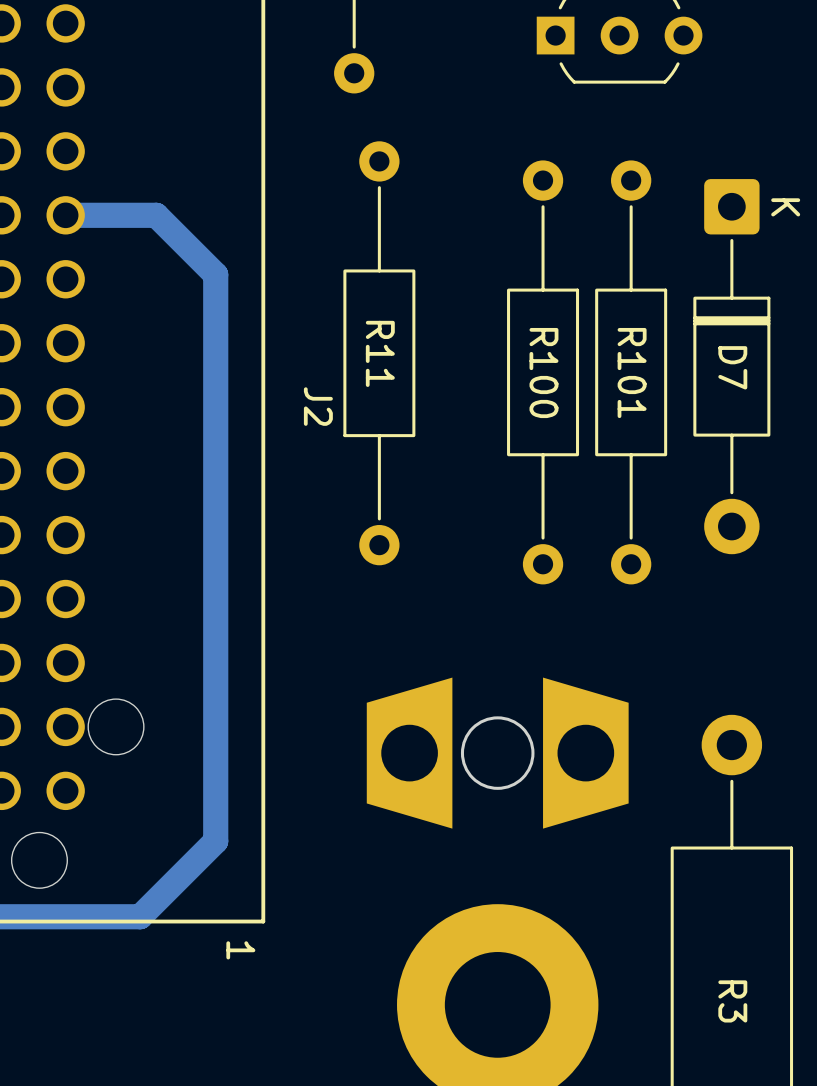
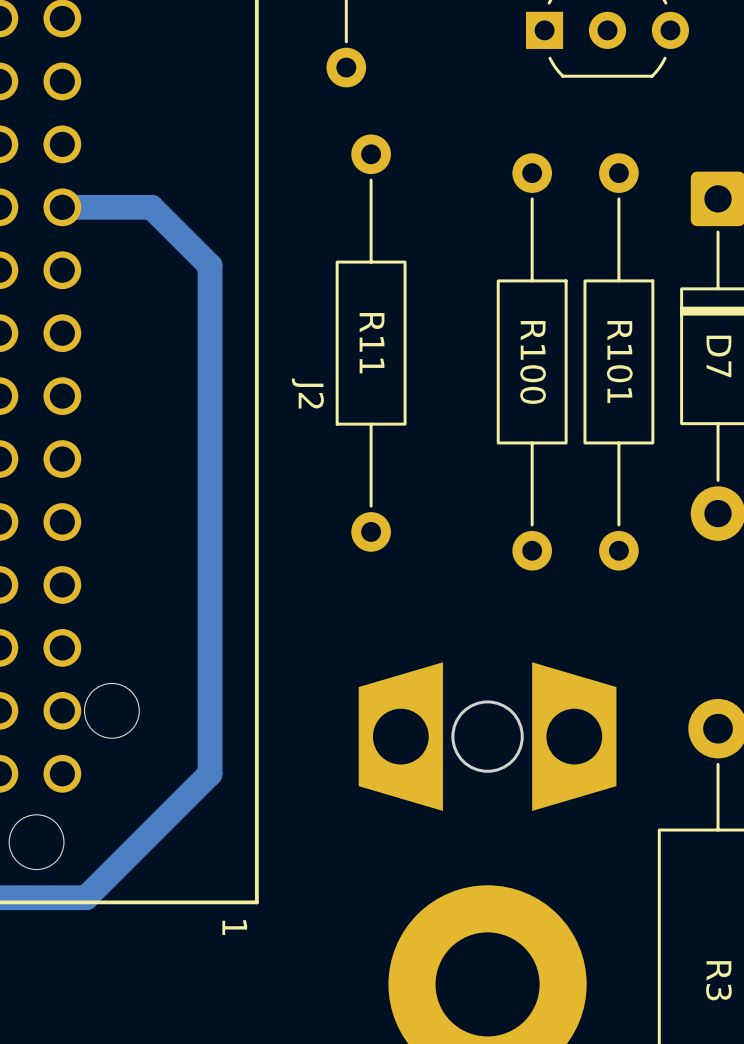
track: (215, 790) (215, 841) (140, 916) (89, 916) -> (210, 773) (86, 897)

